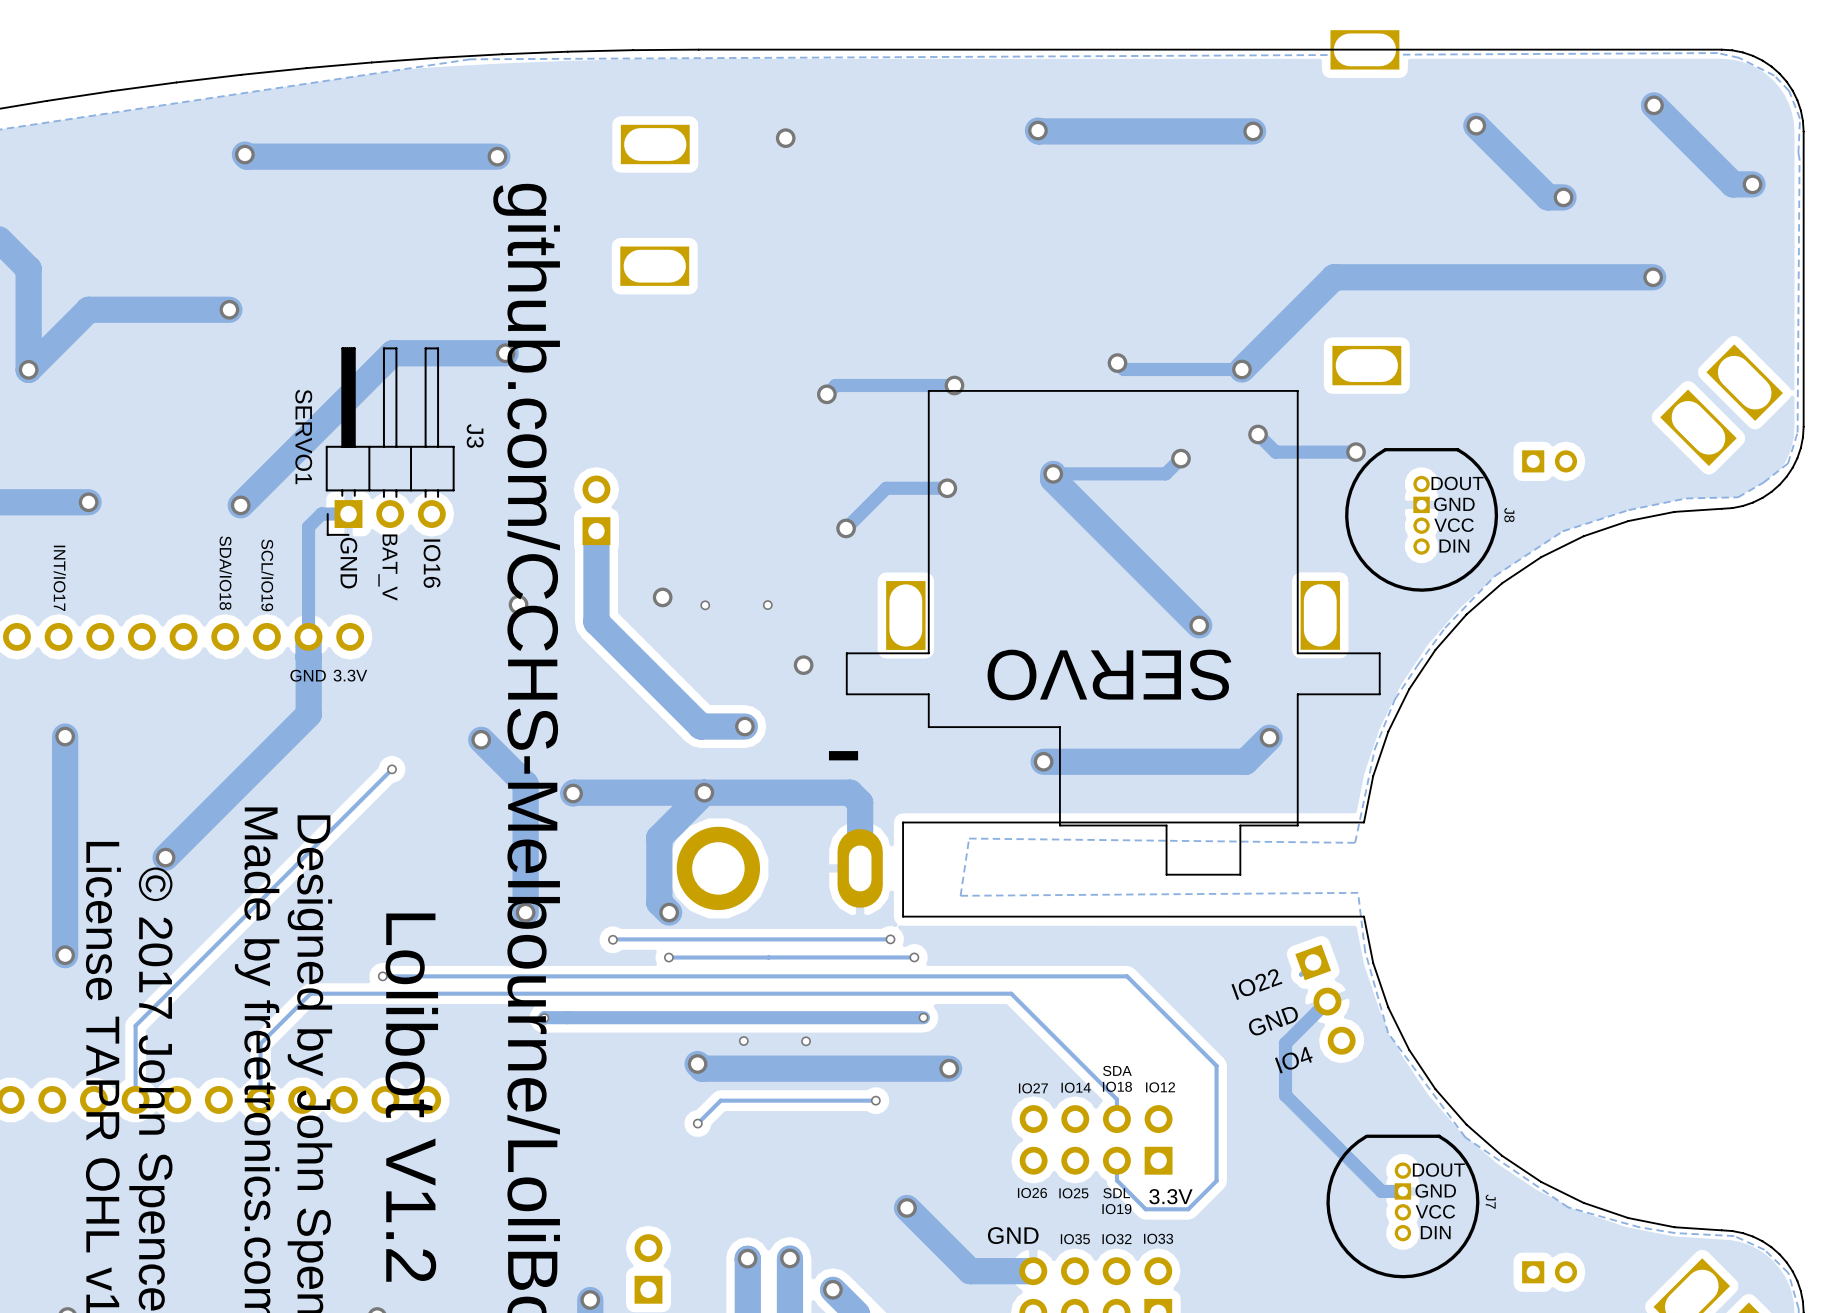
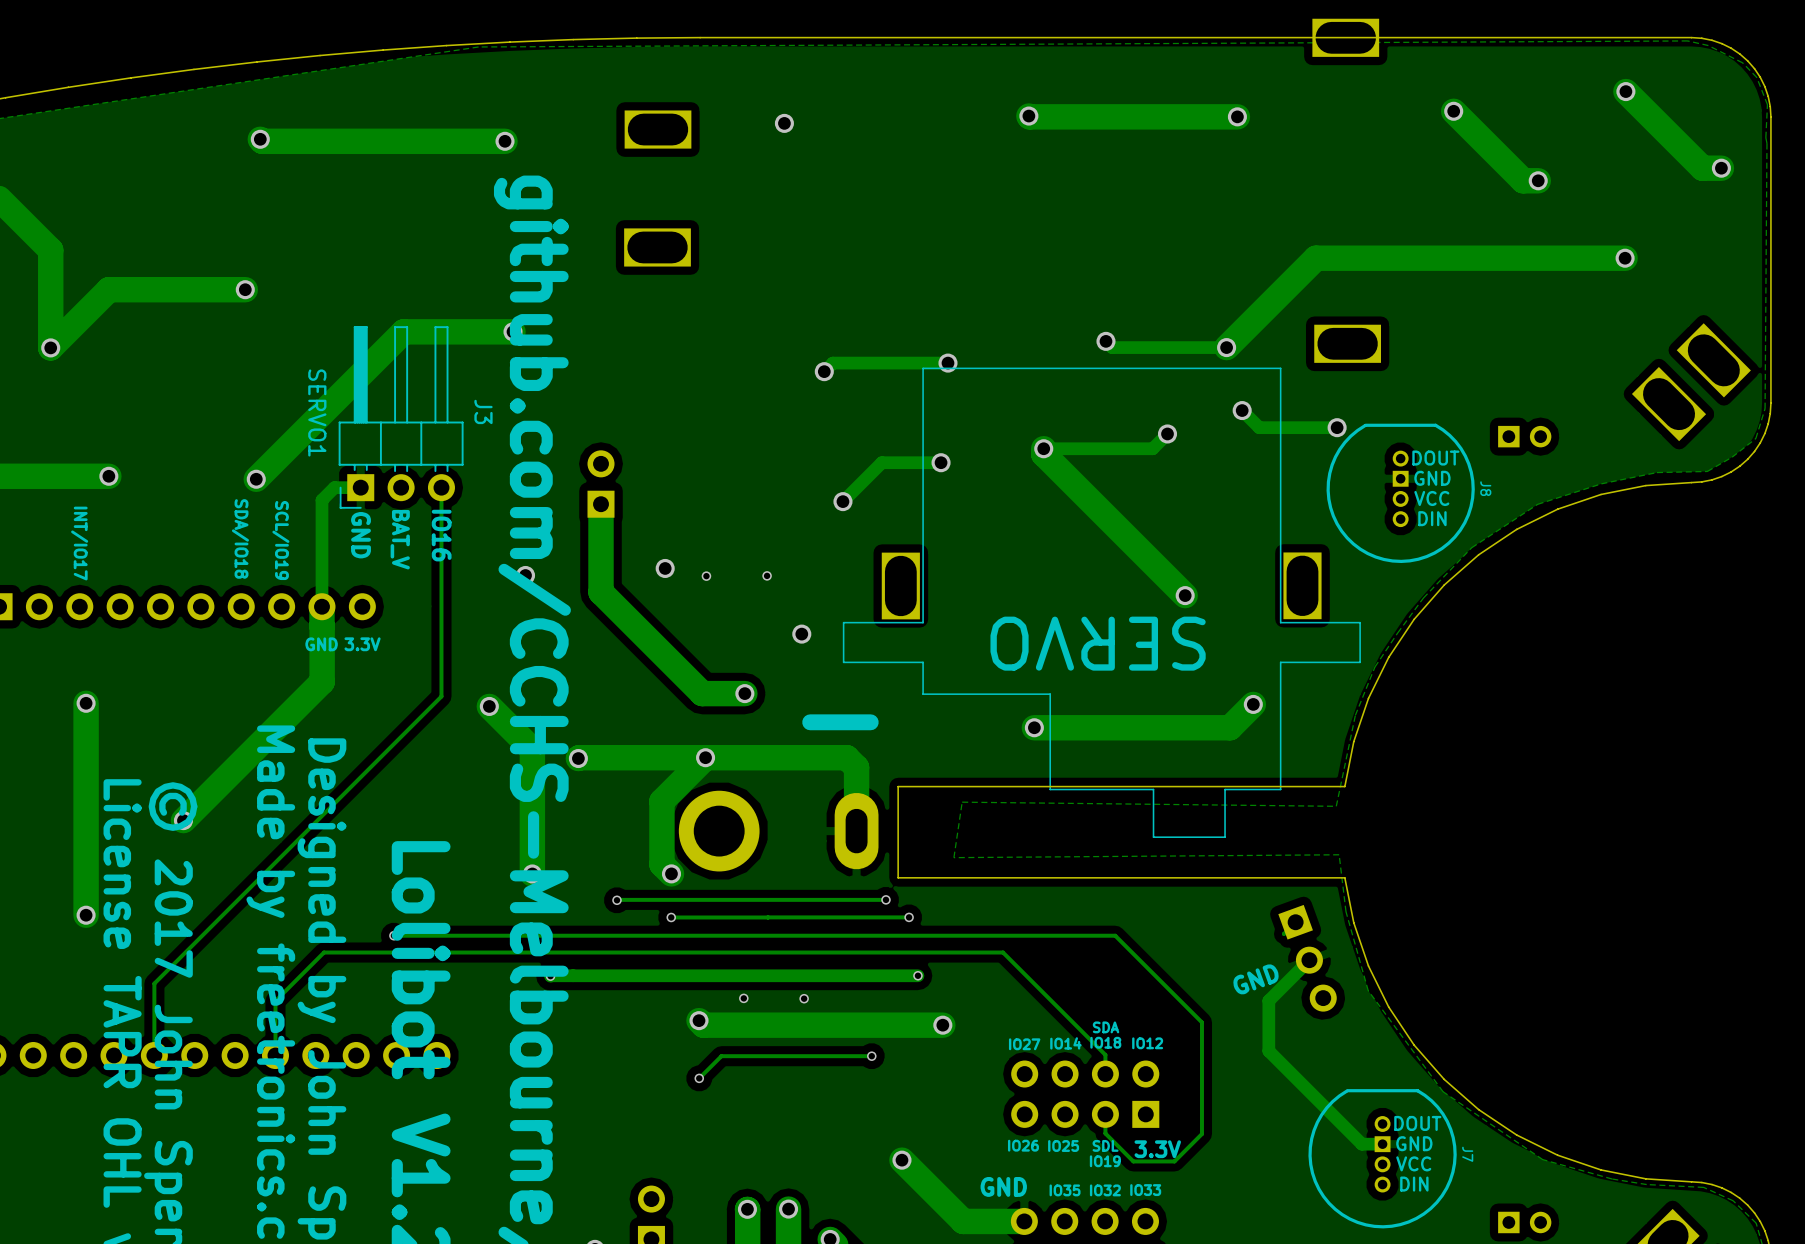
track: none -> (441, 487) (441, 696) (402, 735)
via: (392, 769) -> none
text: IO22 (1256, 984) -> none
text: IO4 (1293, 1060) -> none

